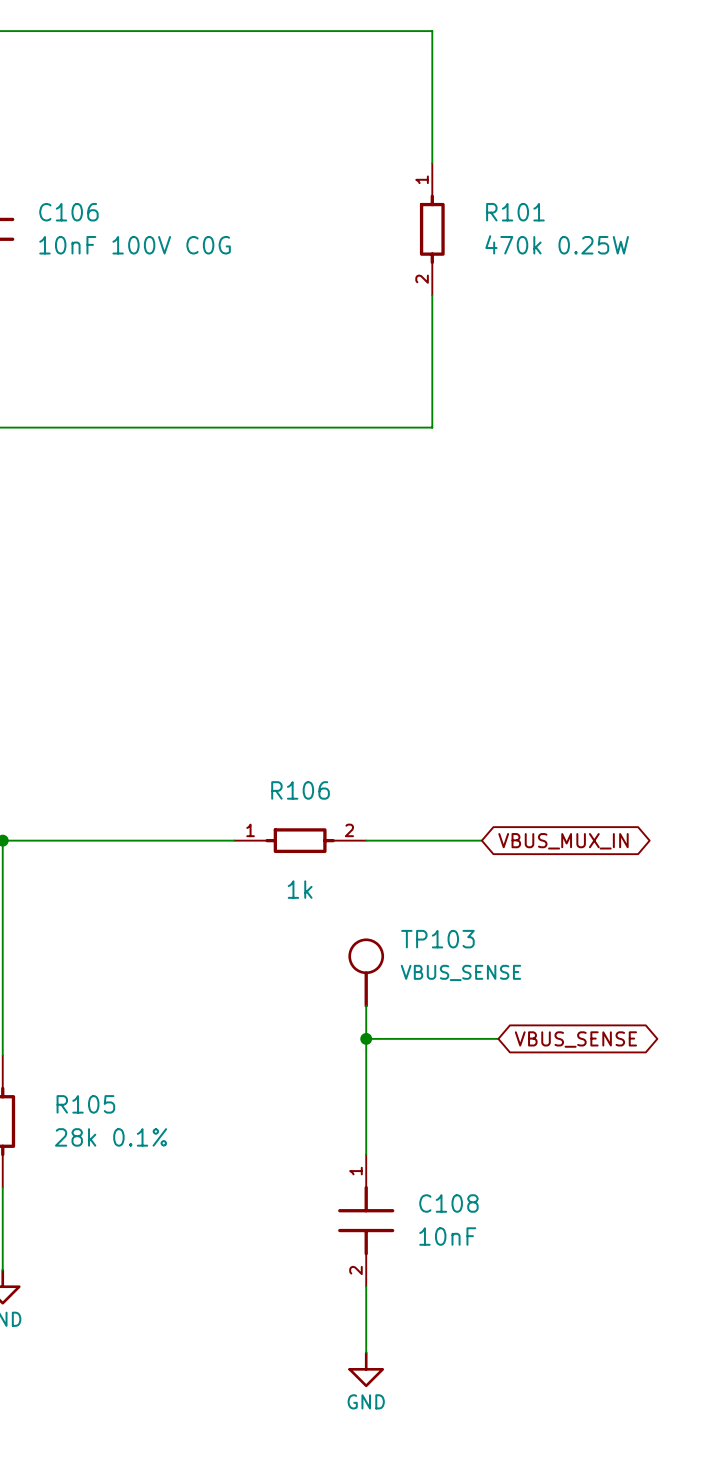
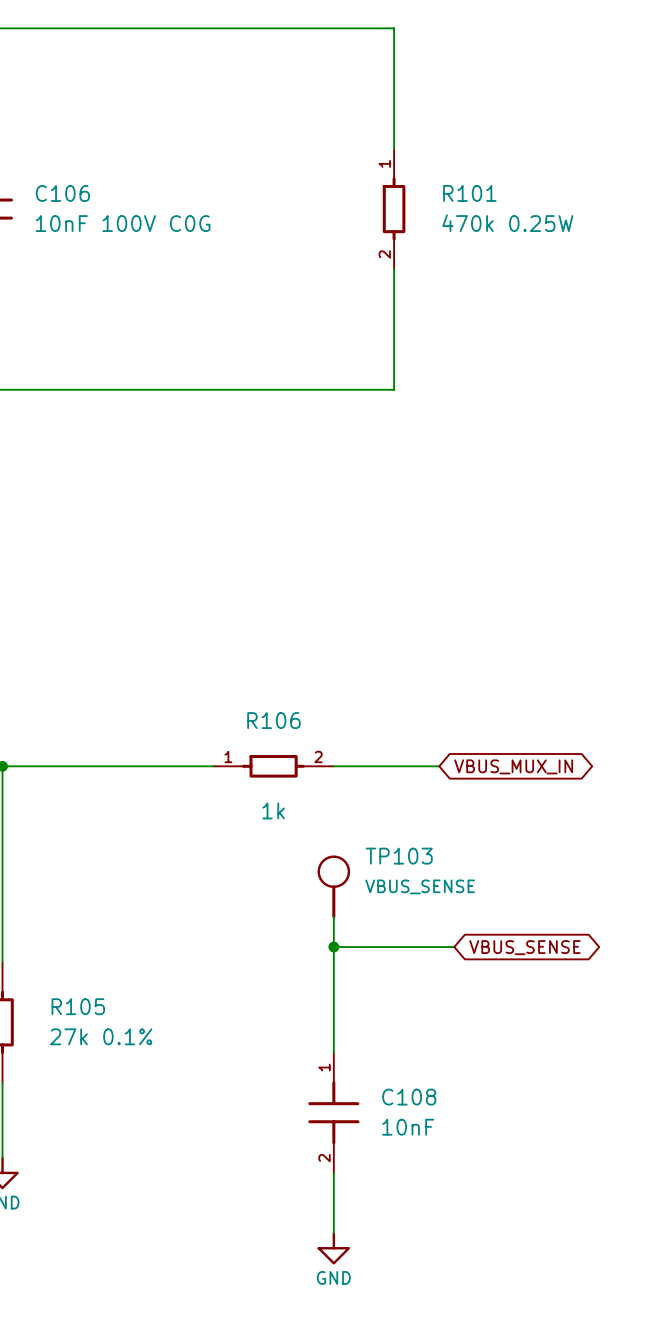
R105 value: 28k 0.1% (111, 1137) -> 27k 0.1% (101, 1036)

